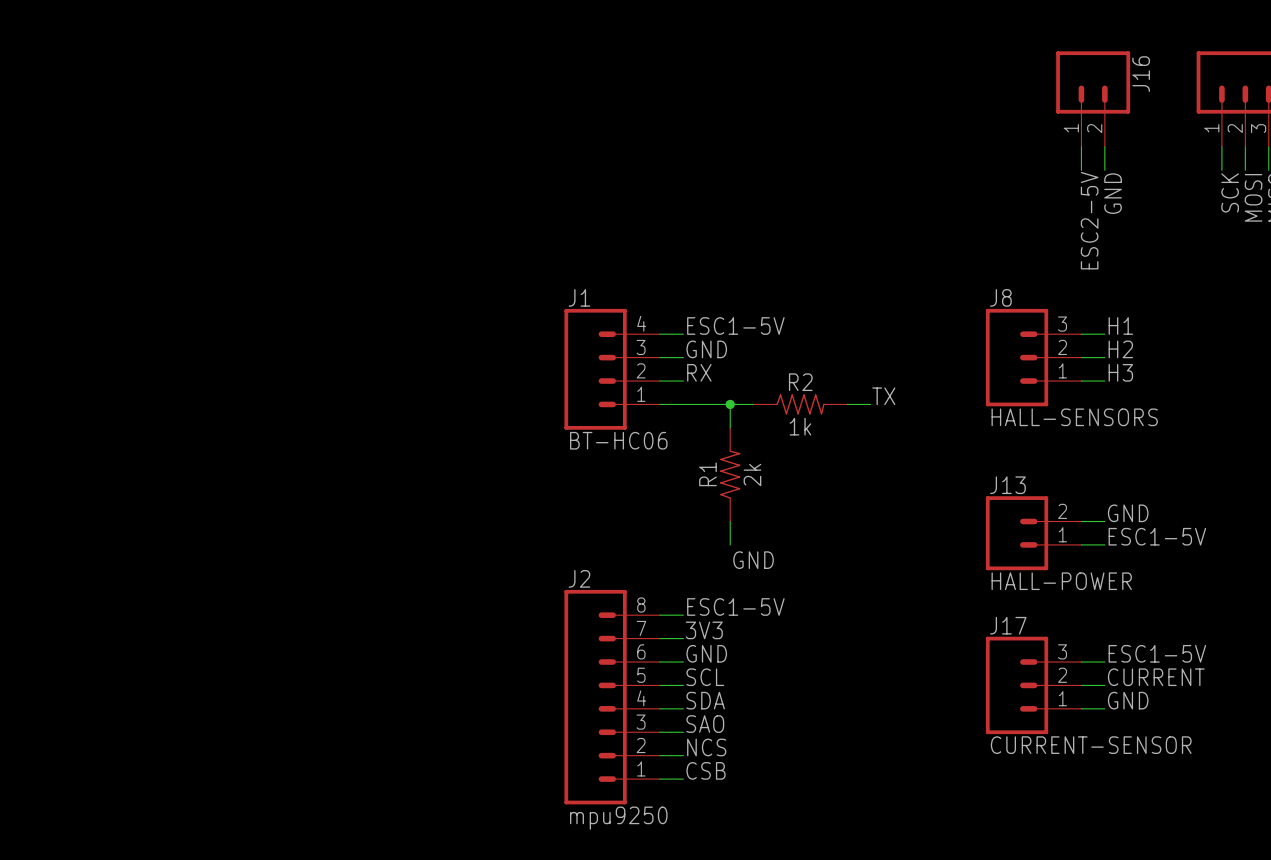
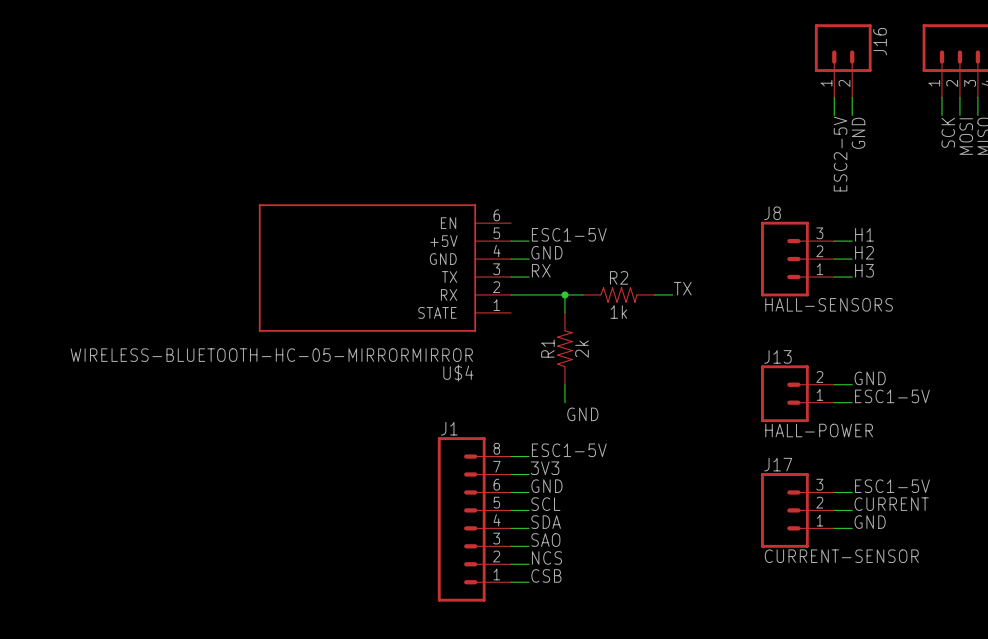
U$4: none -> WIRELESS-BLUETOOTH-HC-05-MIRRORMIRROR (384, 268)
J1: BT-HC06 (612, 369) -> none
J2 name: J2 (579, 578) -> J1 (449, 428)
J2 value: mpu9250 (618, 818) -> none

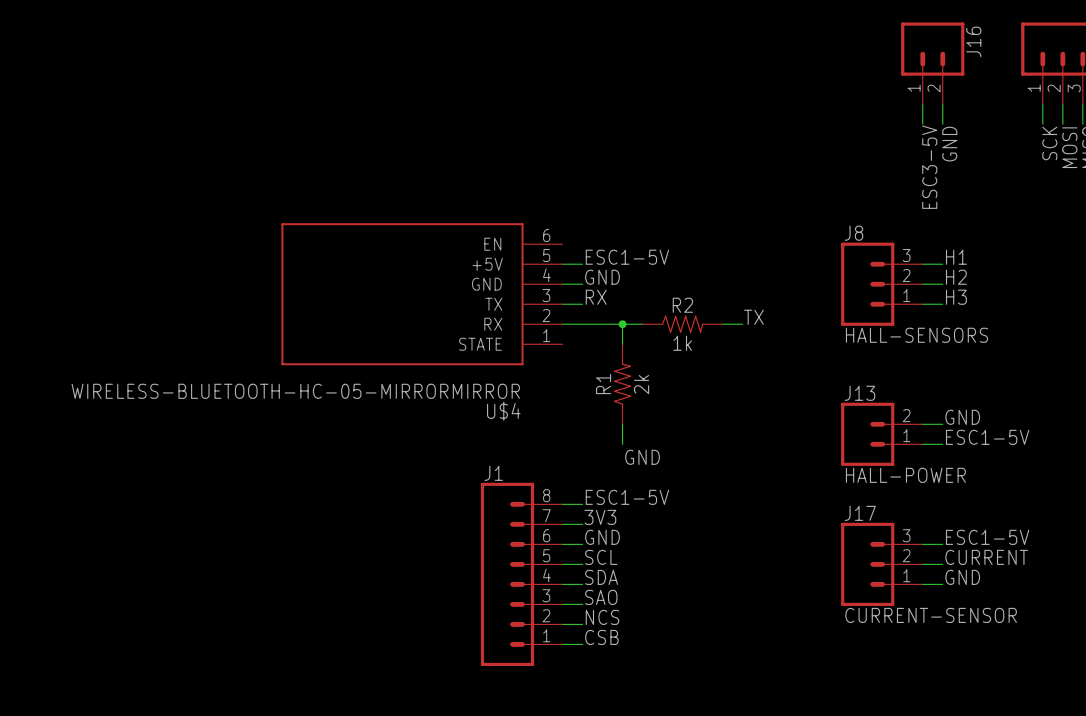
label: ESC2-5V (840, 154) -> ESC3-5V (929, 167)

